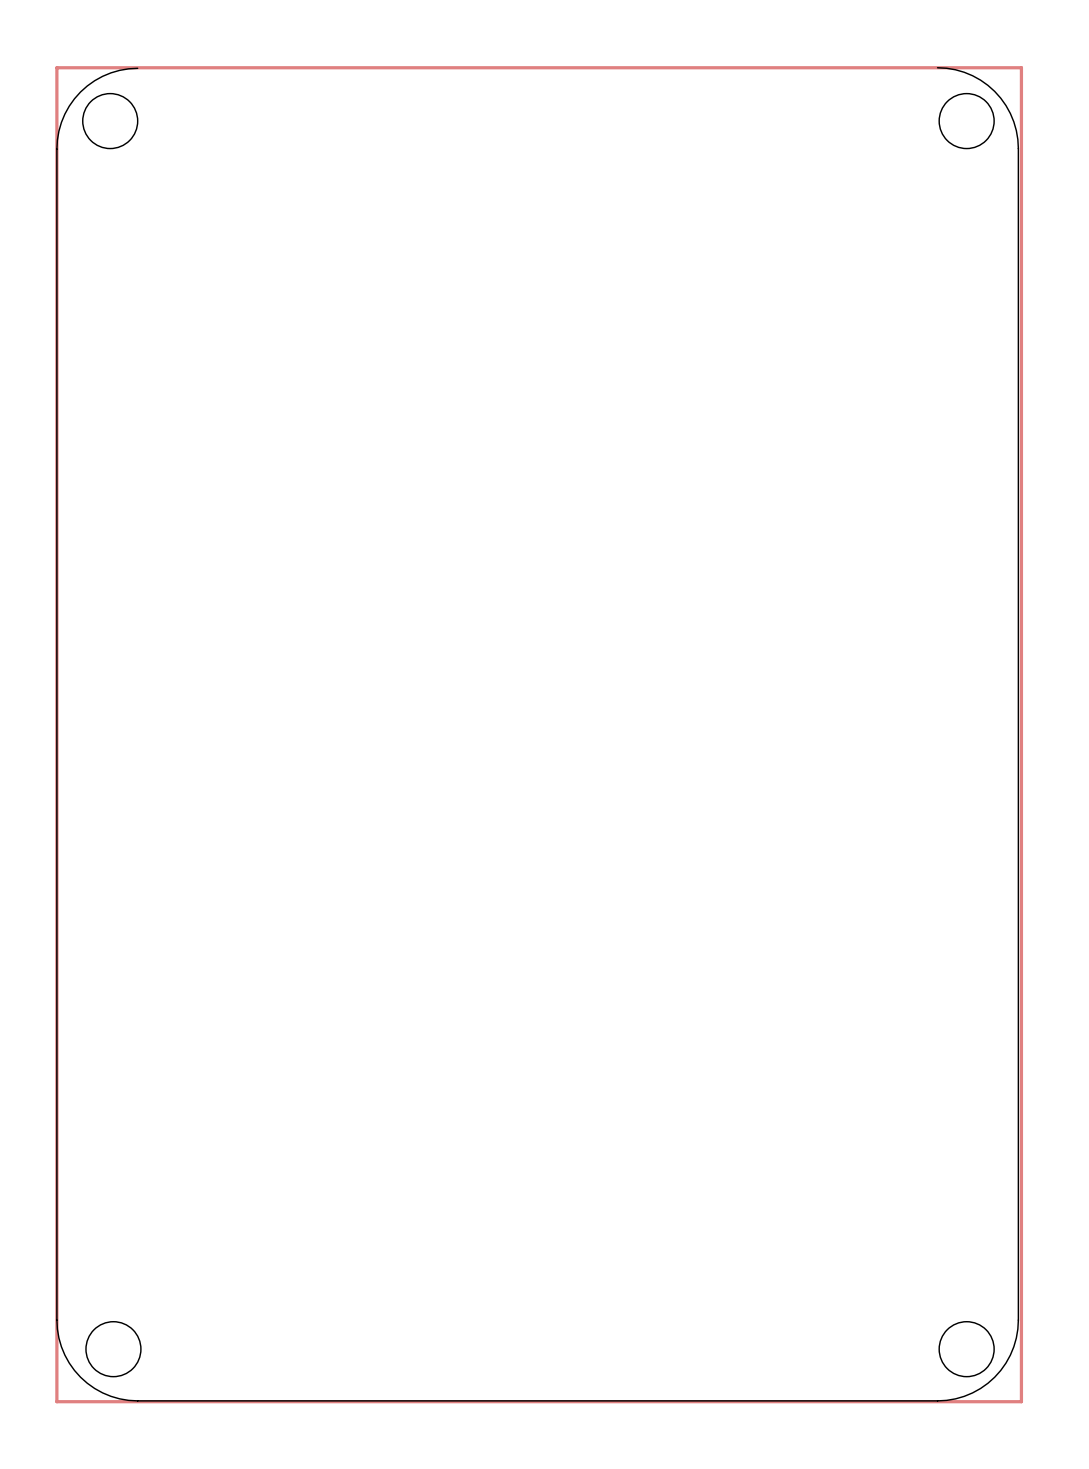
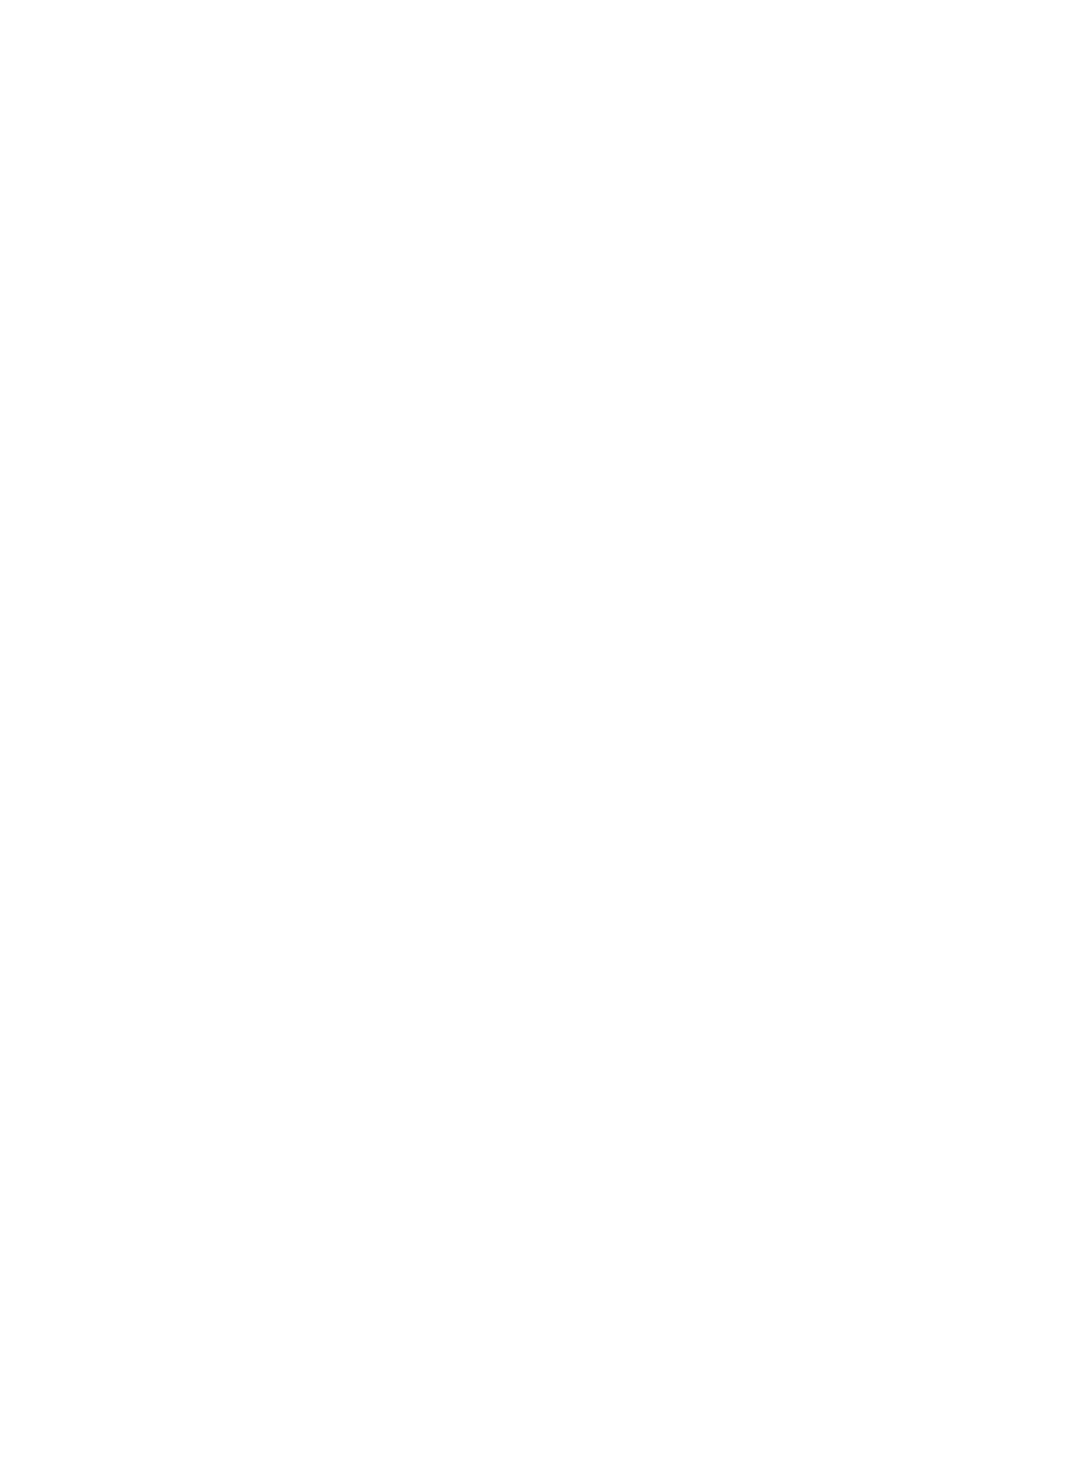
track: (56, 67) (1021, 67) (1021, 1401) (56, 1401) (56, 67) -> none
board edge: (937, 67) (964, 72) (980, 80) (994, 91) (1010, 113) (1016, 130) (1018, 148) (1017, 1329) (1010, 1355) (1000, 1370) (987, 1383) (964, 1396) (937, 1400) (137, 1400) (119, 1398) (94, 1388) (80, 1377) (69, 1363) (61, 1346) (56, 1320) (56, 149) (61, 122) (69, 106) (80, 91) (94, 80) (111, 72) (137, 68) -> none
round board edge: [82, 93, 139, 149] -> none
round board edge: [938, 93, 995, 149] -> none
round board edge: [85, 1321, 142, 1378] -> none
round board edge: [938, 1321, 995, 1378] -> none

